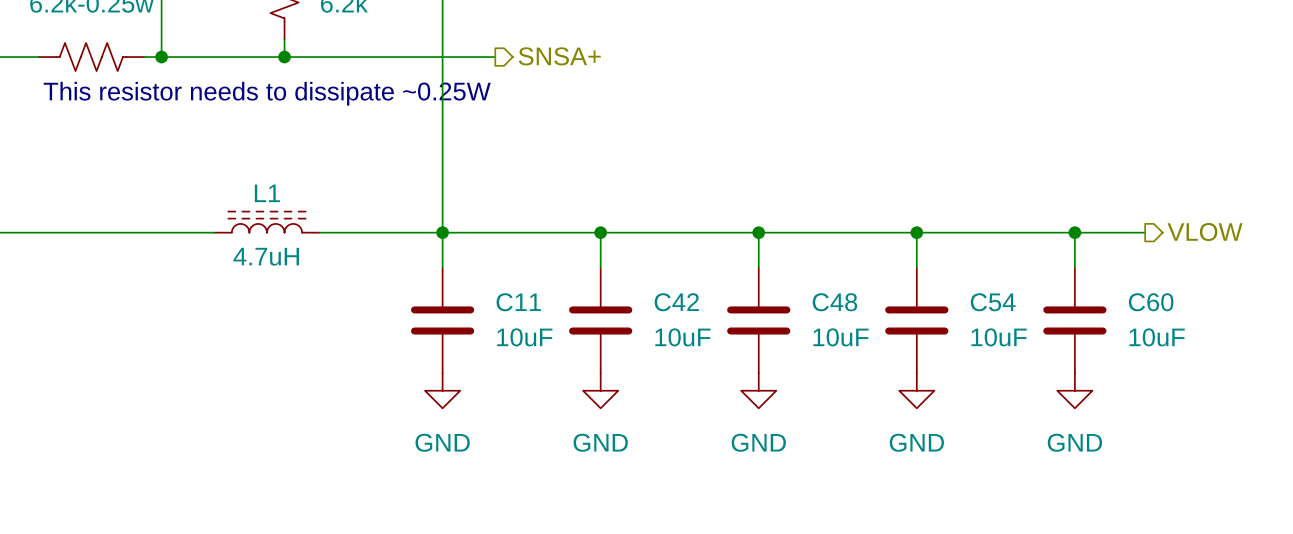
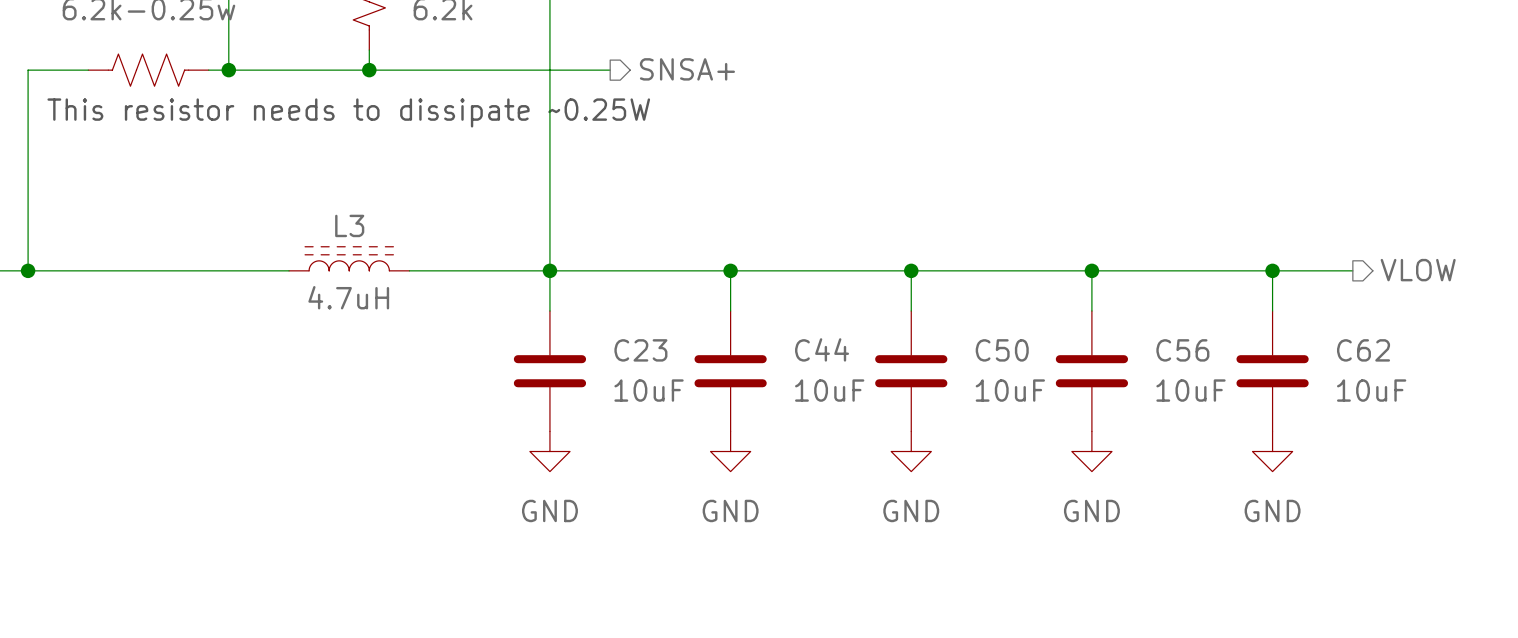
L1 name: L1 (267, 193) -> L3 (349, 225)
C11 name: C11 (518, 302) -> C23 (640, 350)
C42 name: C42 (676, 302) -> C44 (822, 349)
C48 name: C48 (834, 302) -> C50 (1002, 350)
C54 name: C54 (993, 302) -> C56 (1182, 350)
C60 name: C60 (1151, 302) -> C62 (1363, 350)

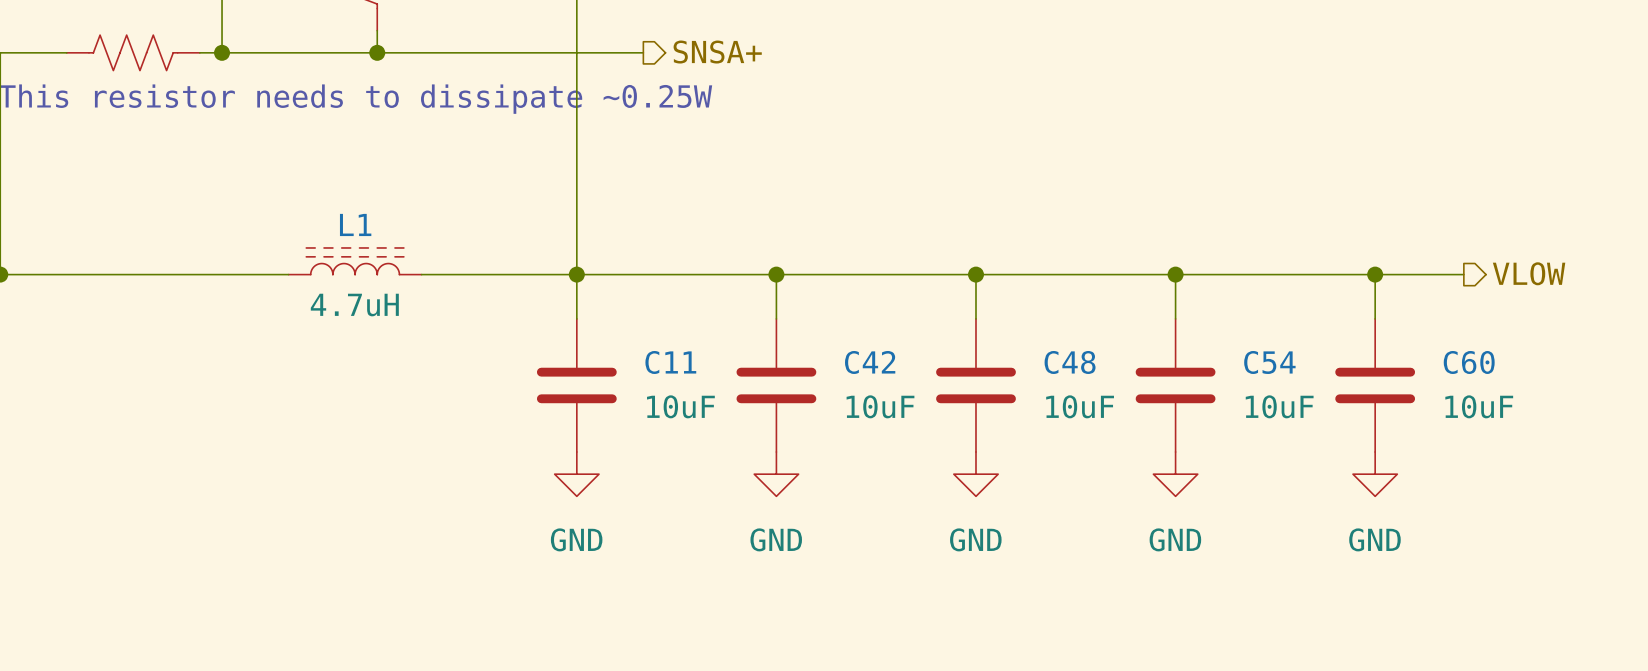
L3 name: L3 (349, 225) -> L1 (355, 224)
C44 name: C44 (822, 349) -> C42 (870, 362)
C23 name: C23 (640, 350) -> C11 (670, 362)
C50 name: C50 (1002, 350) -> C48 (1070, 362)
C56 name: C56 (1182, 350) -> C54 (1269, 362)
C62 name: C62 (1363, 350) -> C60 (1469, 362)

